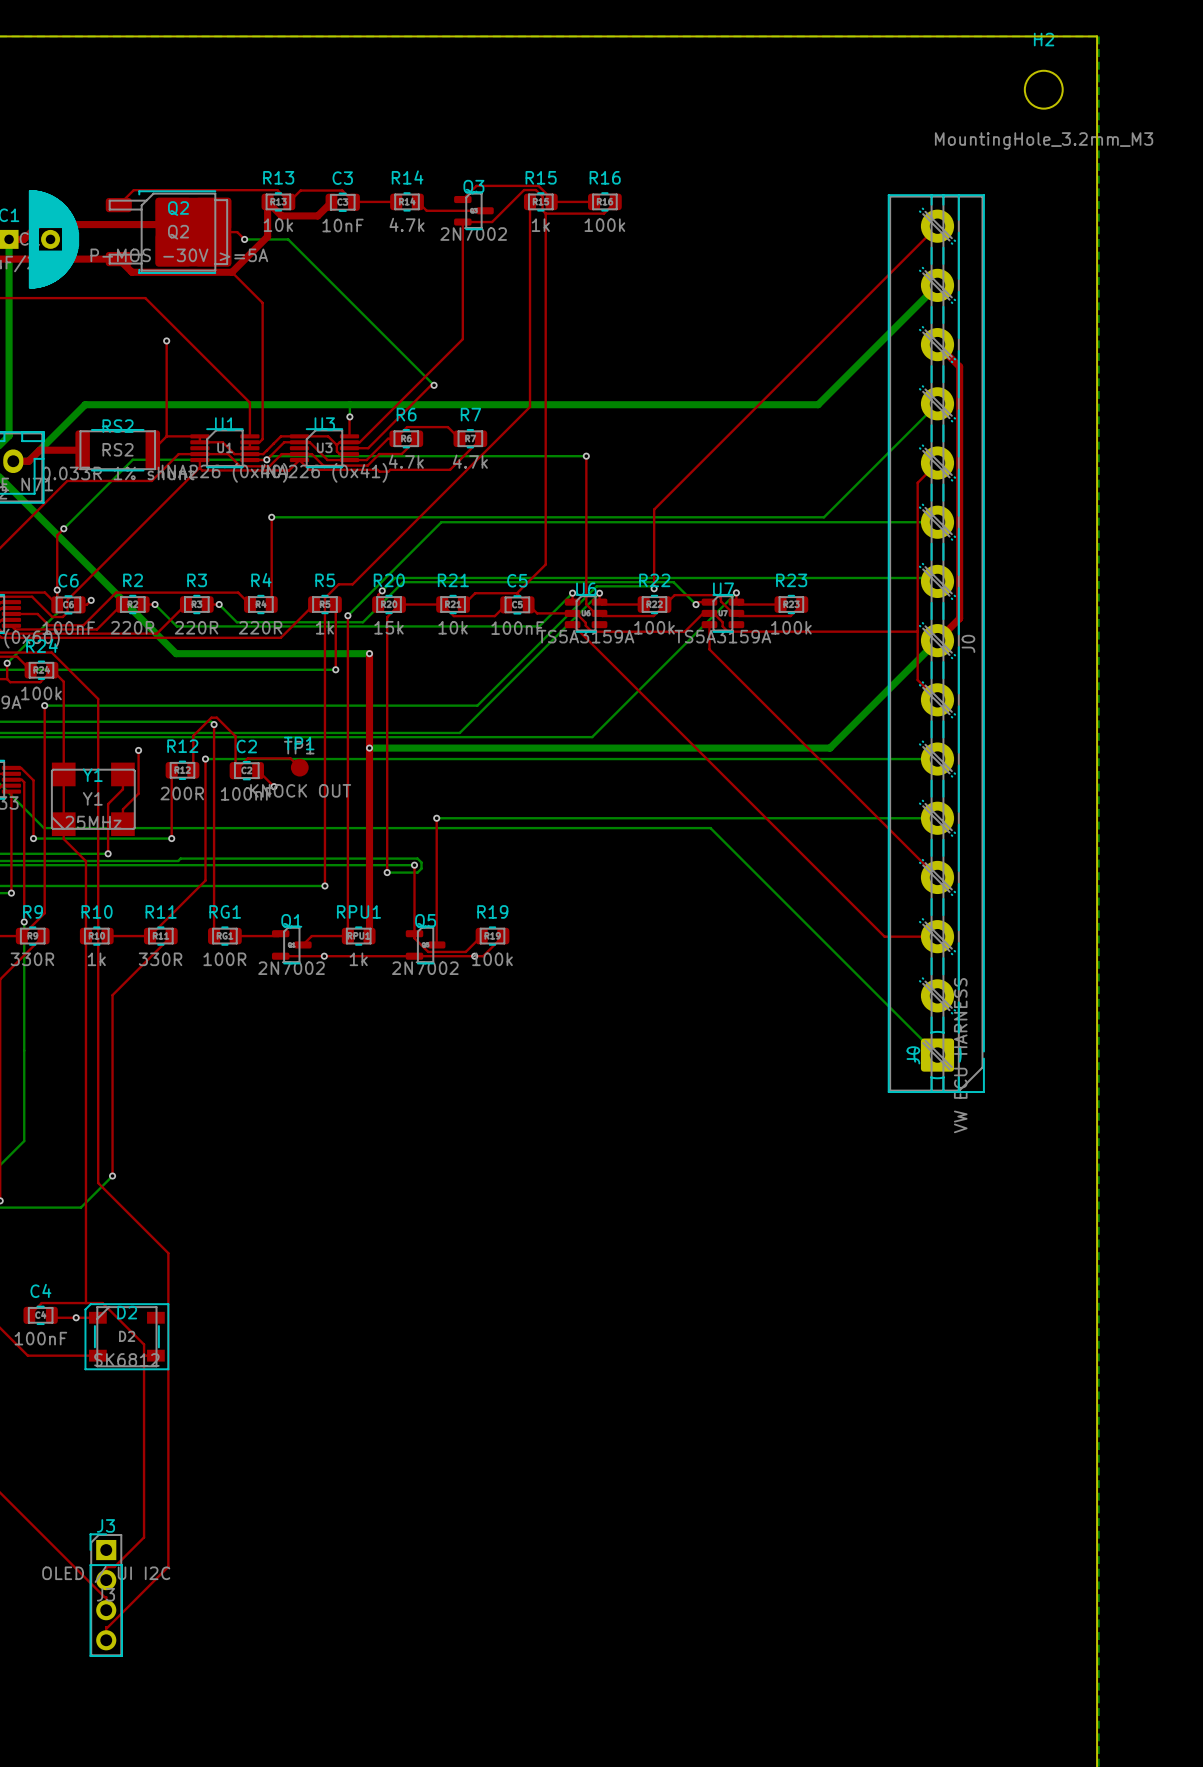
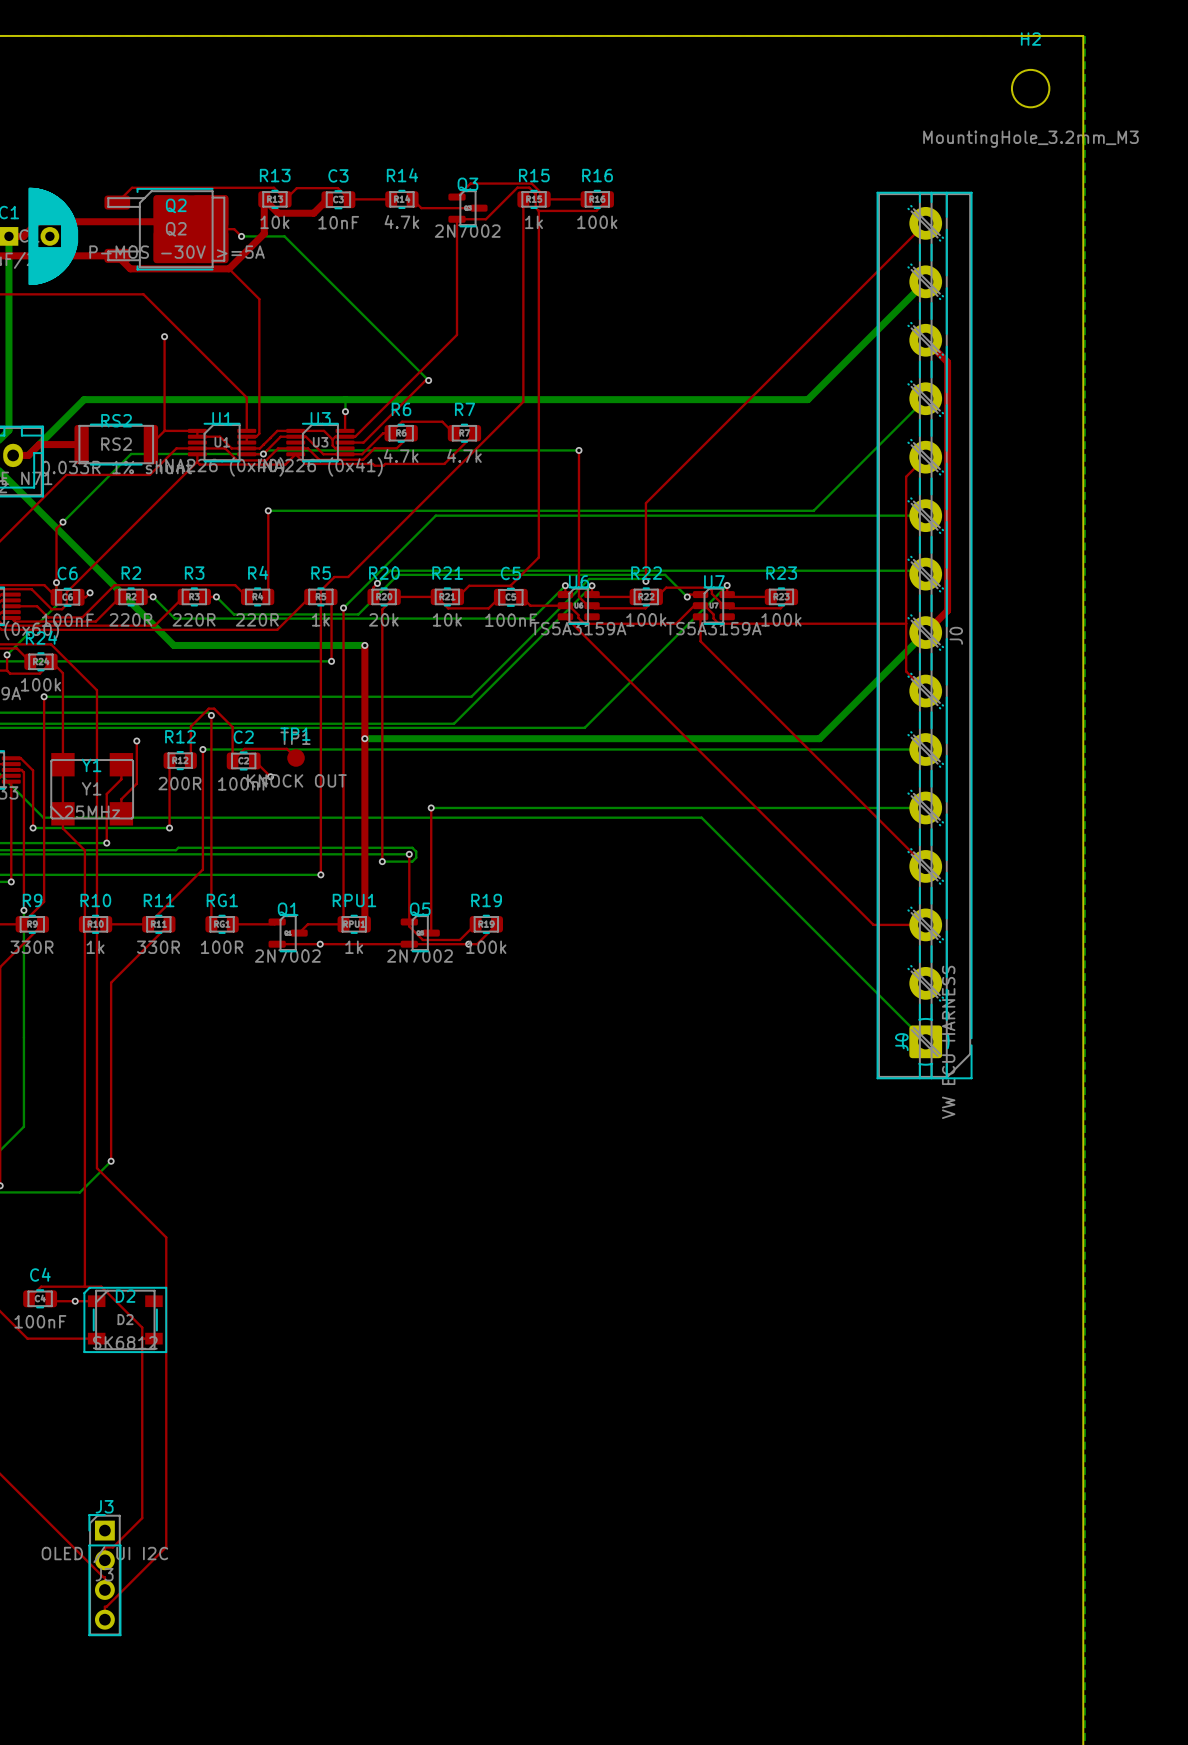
R20 value: 15k (389, 627) -> 20k (383, 619)

